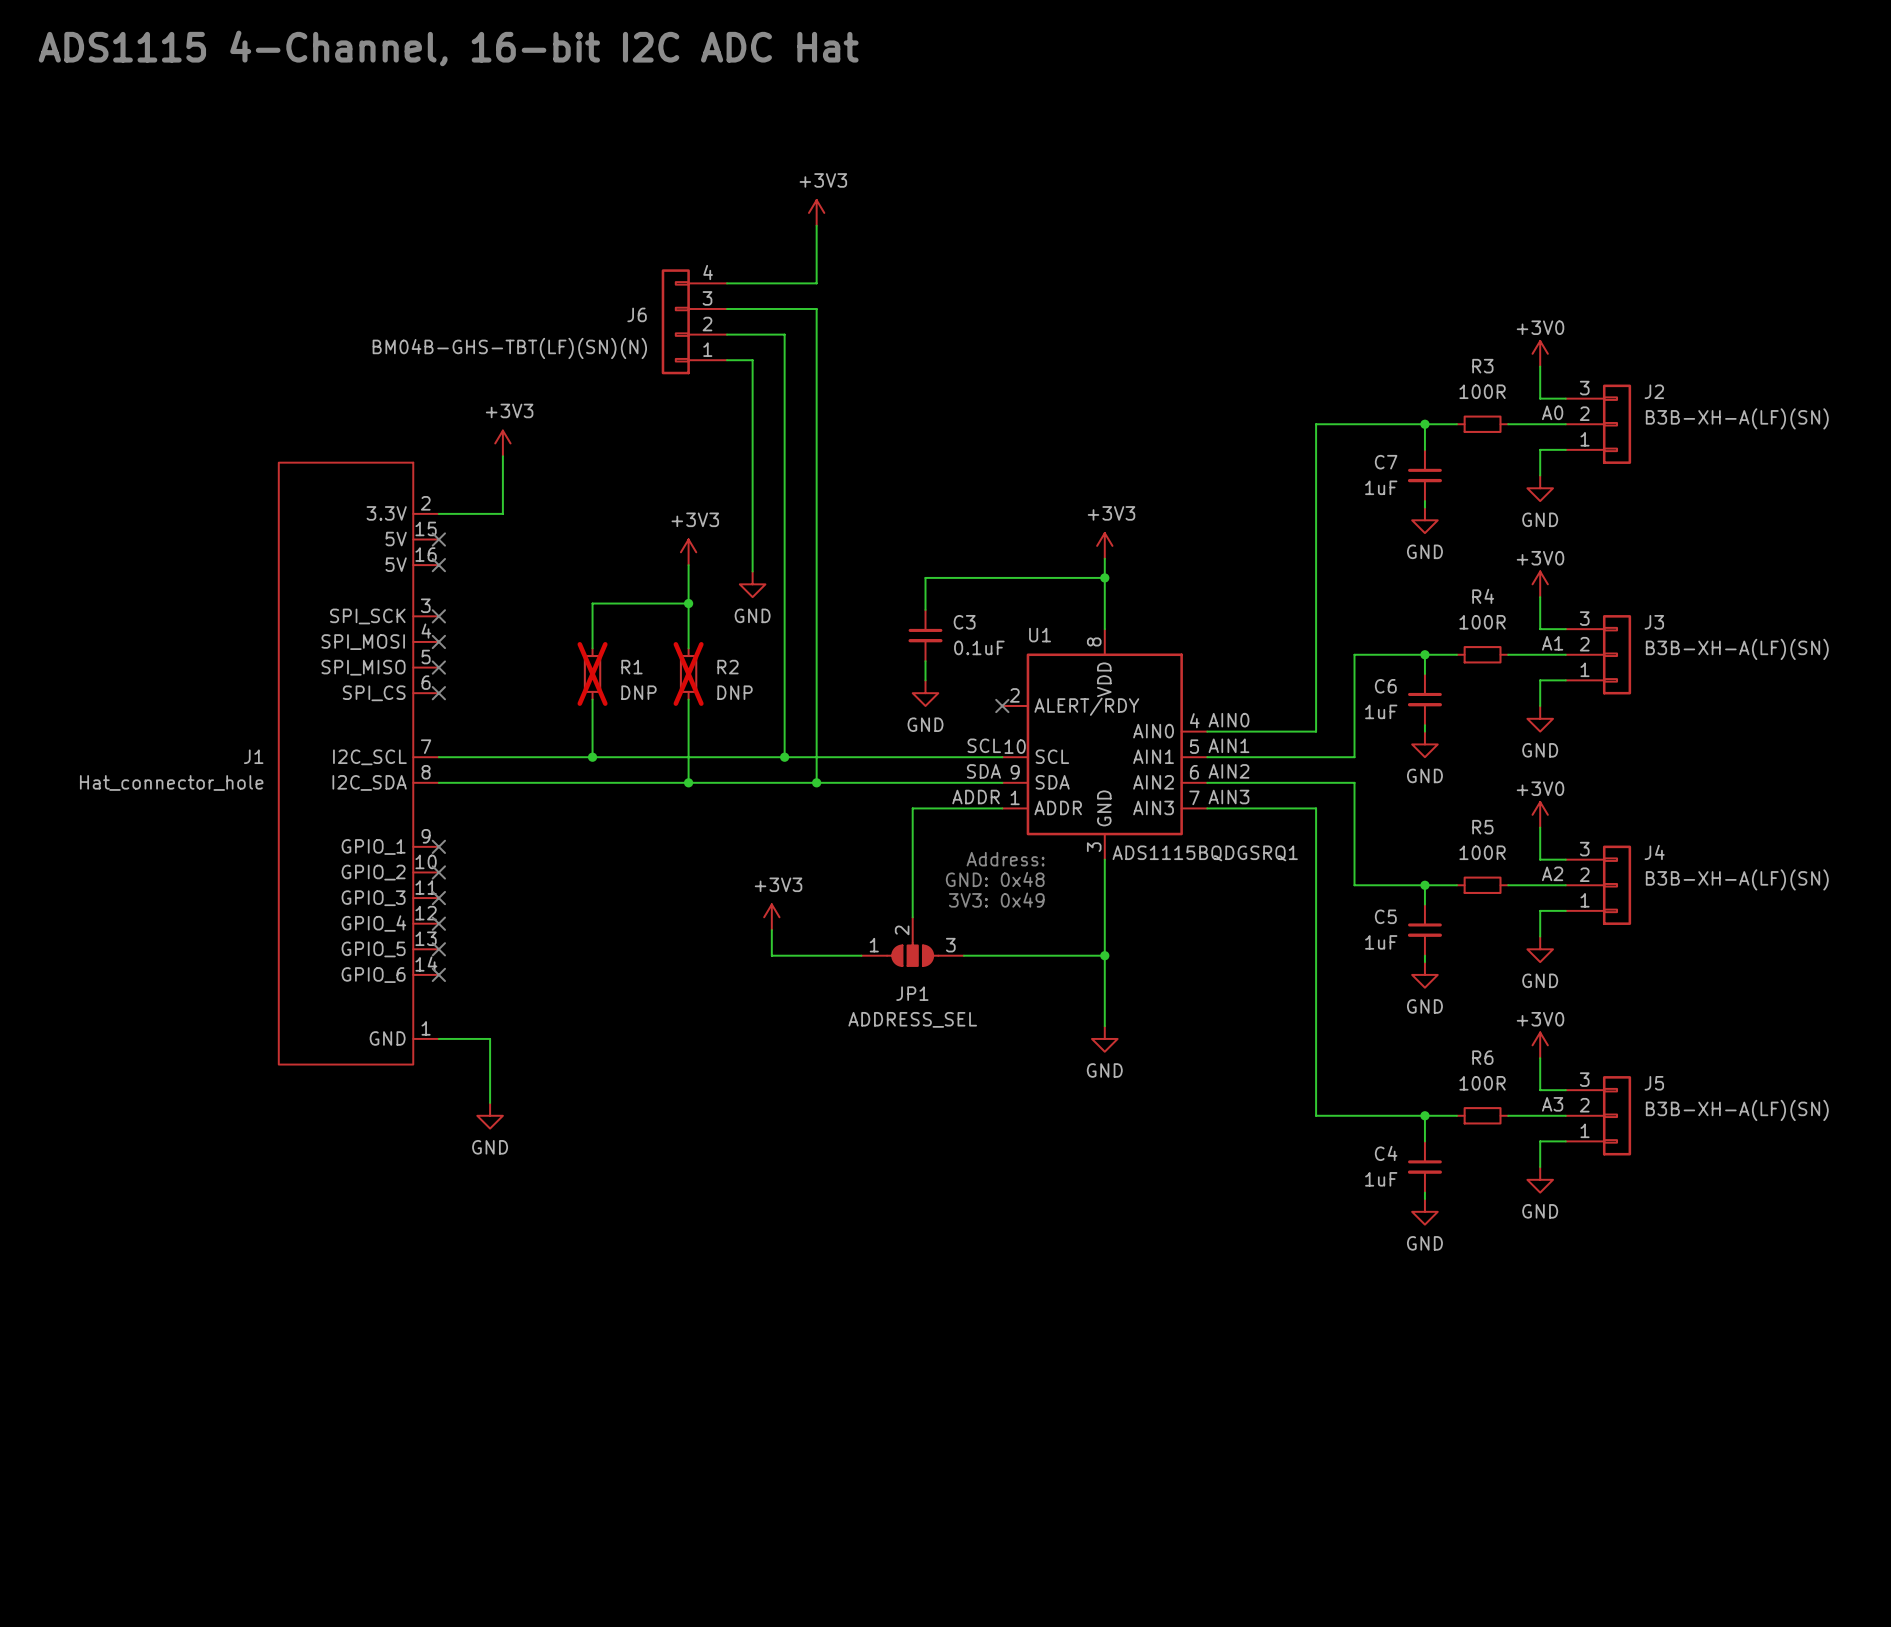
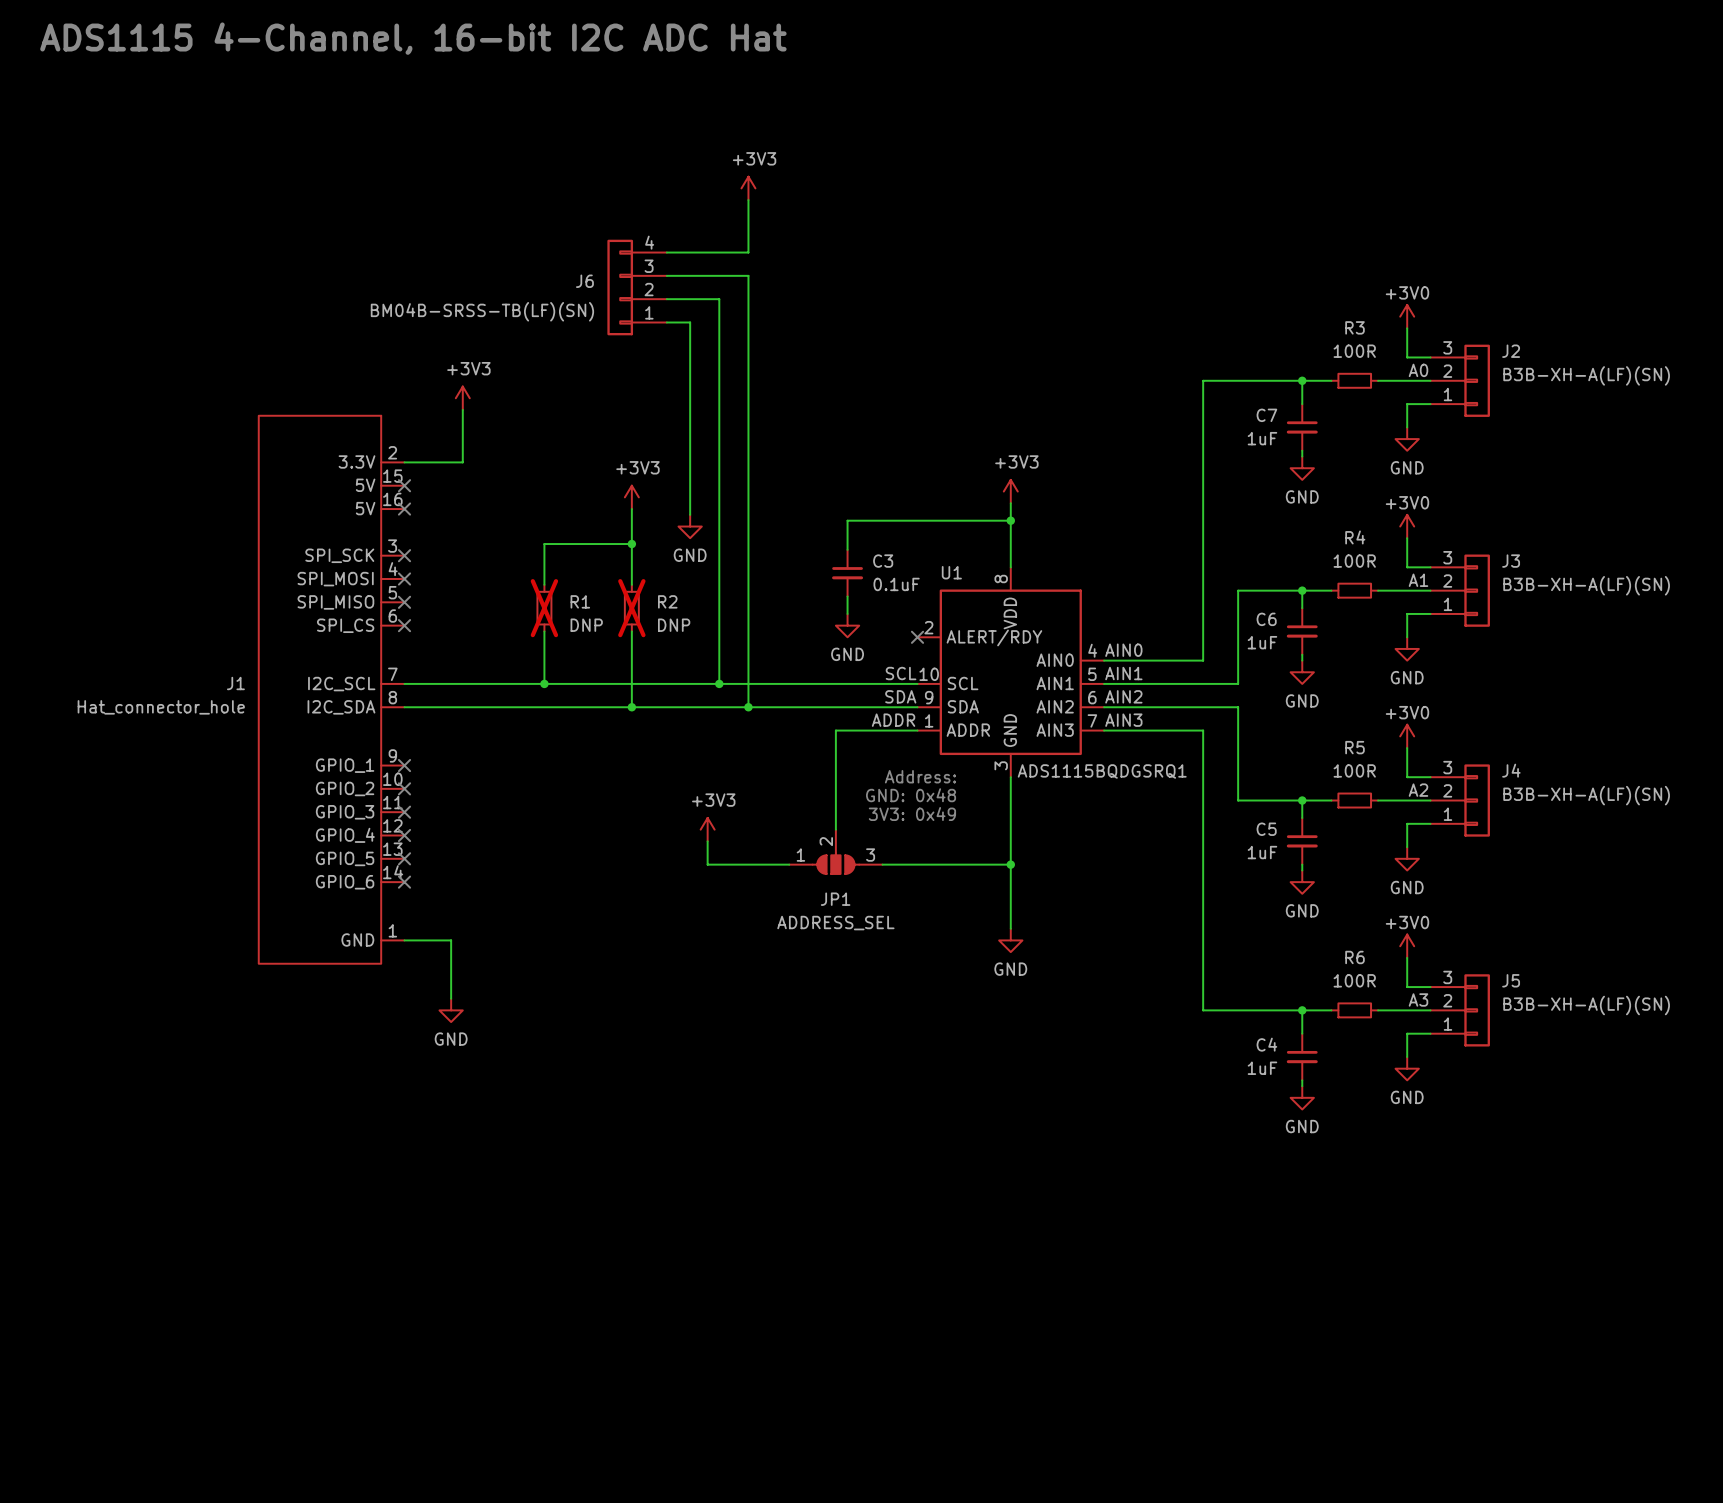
J6 value: BM04B-GHS-TBT(LF)(SN)(N) (509, 348) -> BM04B-SRSS-TB(LF)(SN) (482, 311)

